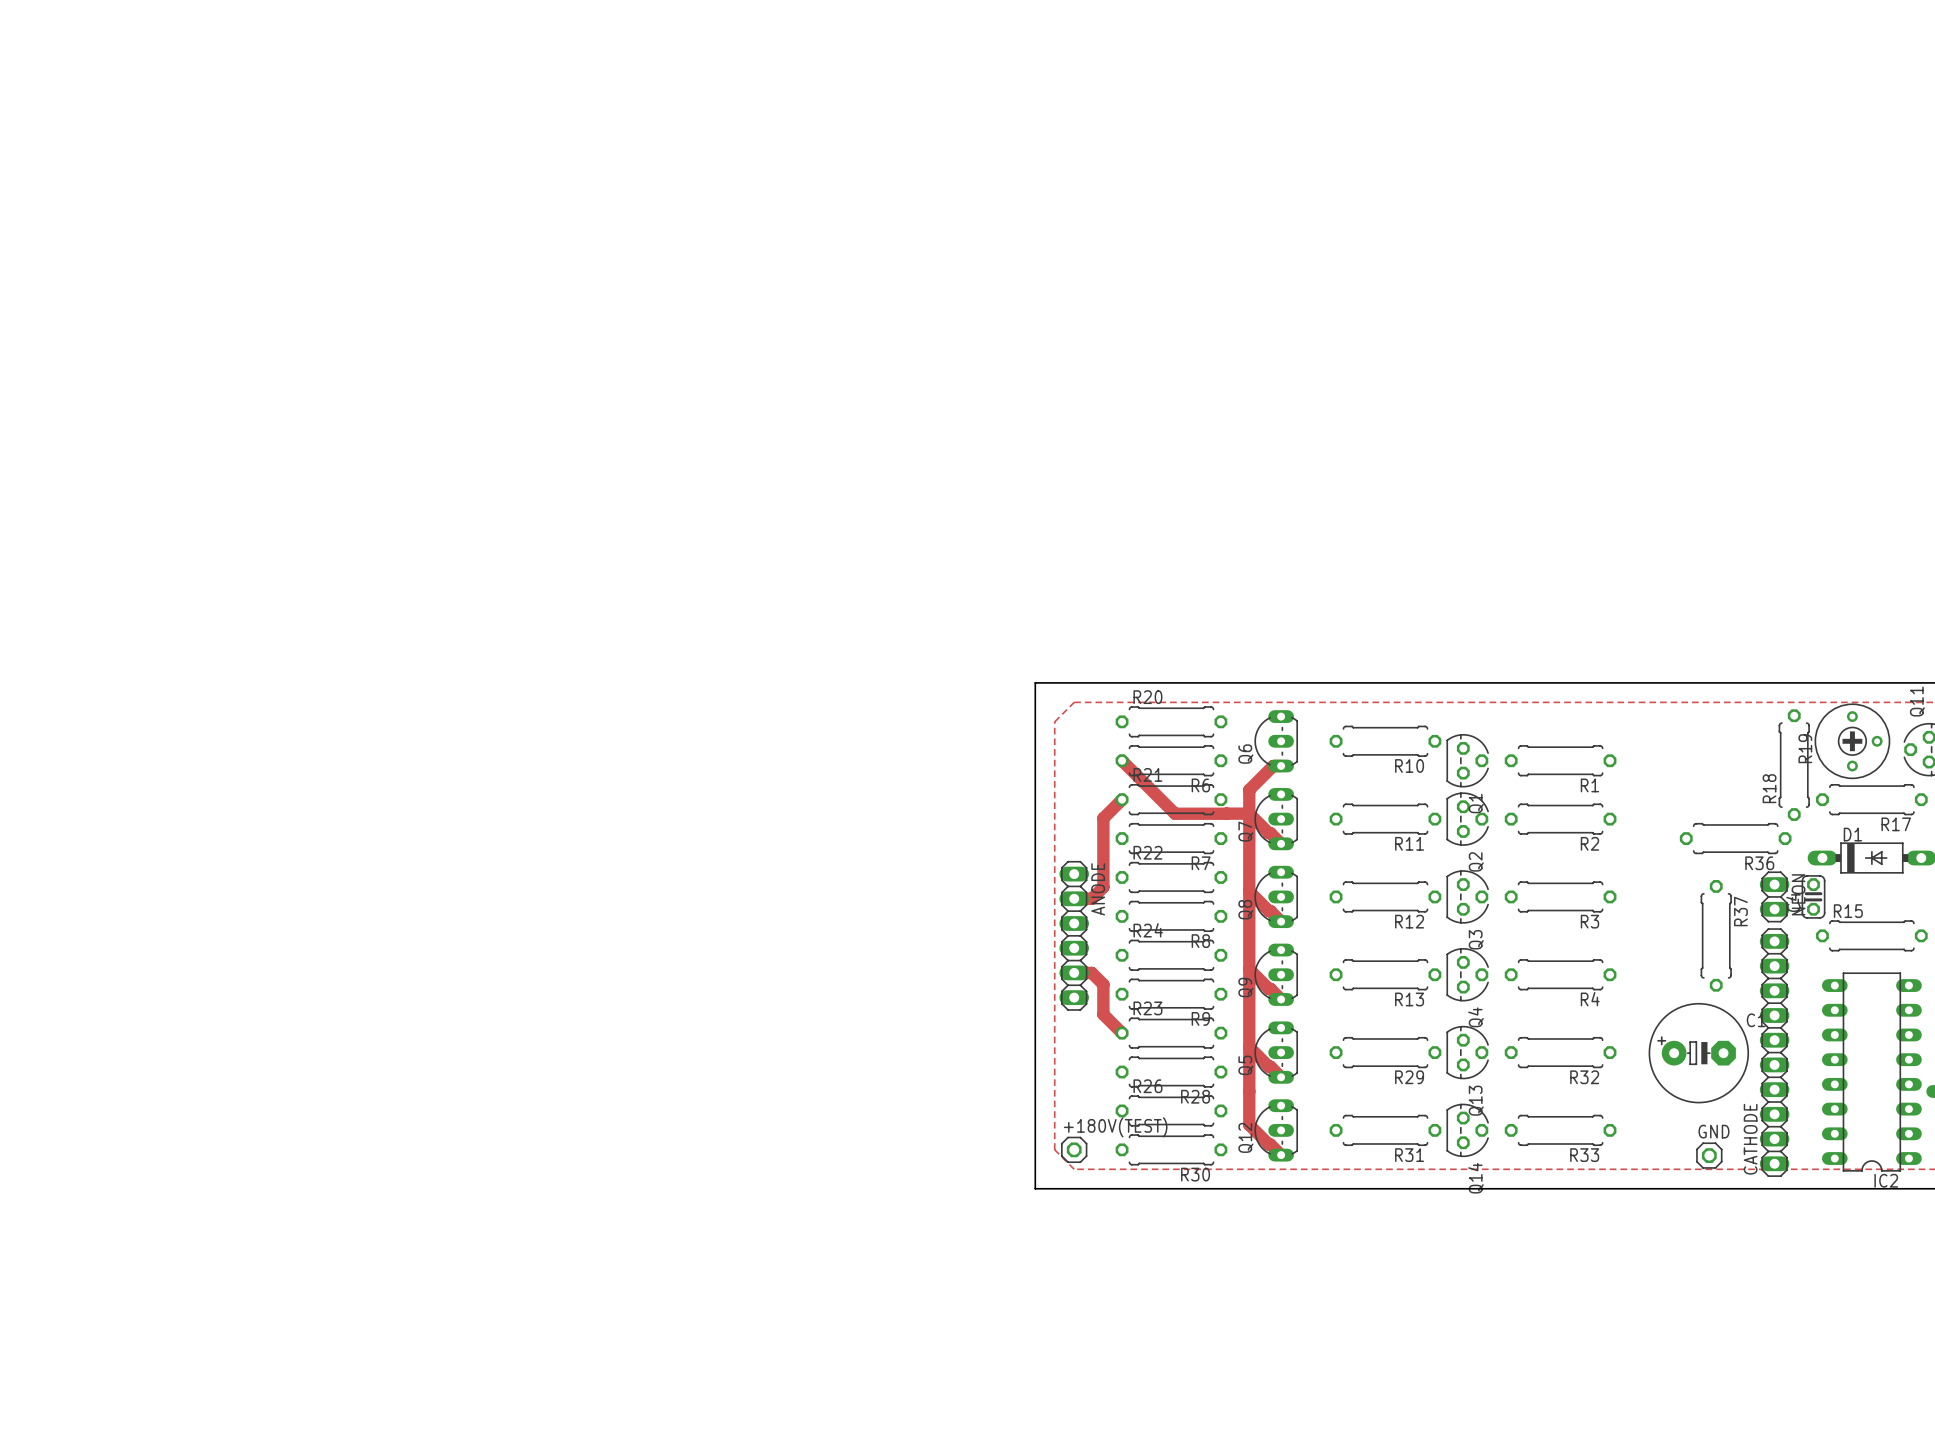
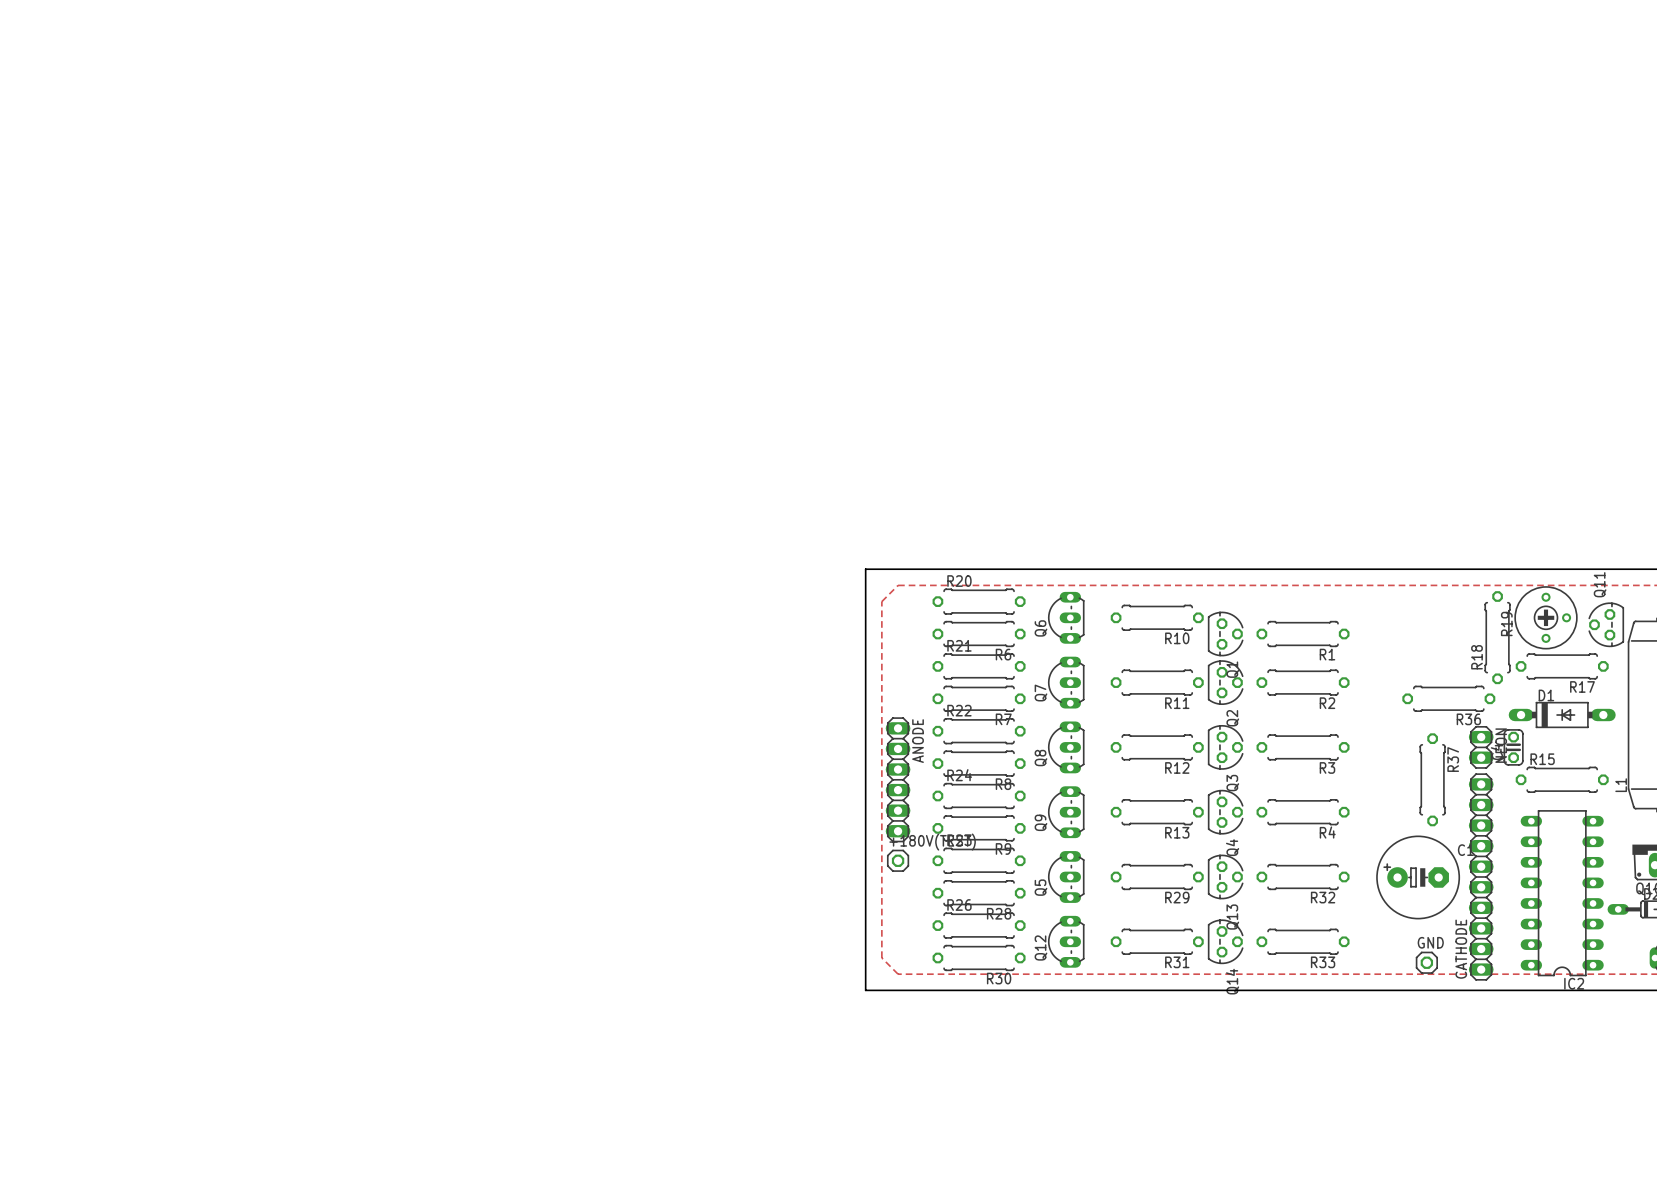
track: (1122, 760) (1175, 813) (1226, 813) -> none
track: (1281, 766) (1273, 766) (1249, 789) (1249, 1124) (1281, 1155) -> none
track: (1122, 799) (1103, 818) (1103, 887) (1091, 898) (1074, 898) -> none
track: (1226, 813) (1249, 813) (1281, 843) -> none
track: (1249, 891) (1281, 921) -> none
track: (1249, 969) (1281, 999) -> none
track: (1074, 972) (1091, 972) (1103, 984) (1103, 1014) (1122, 1033) -> none
track: (1249, 1047) (1281, 1077) -> none
+180V(TEST) position: (1074, 1149) -> (898, 860)

